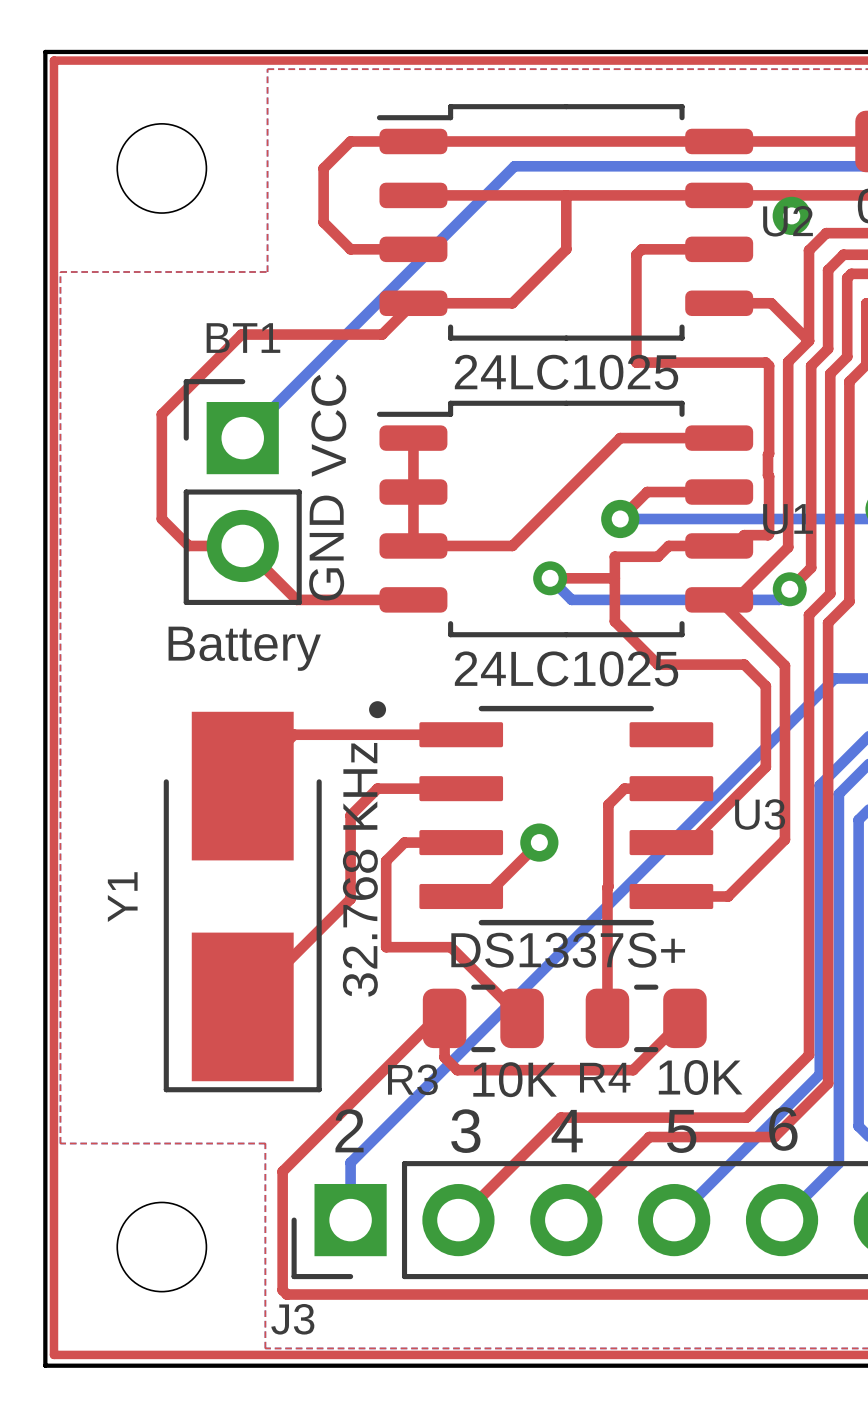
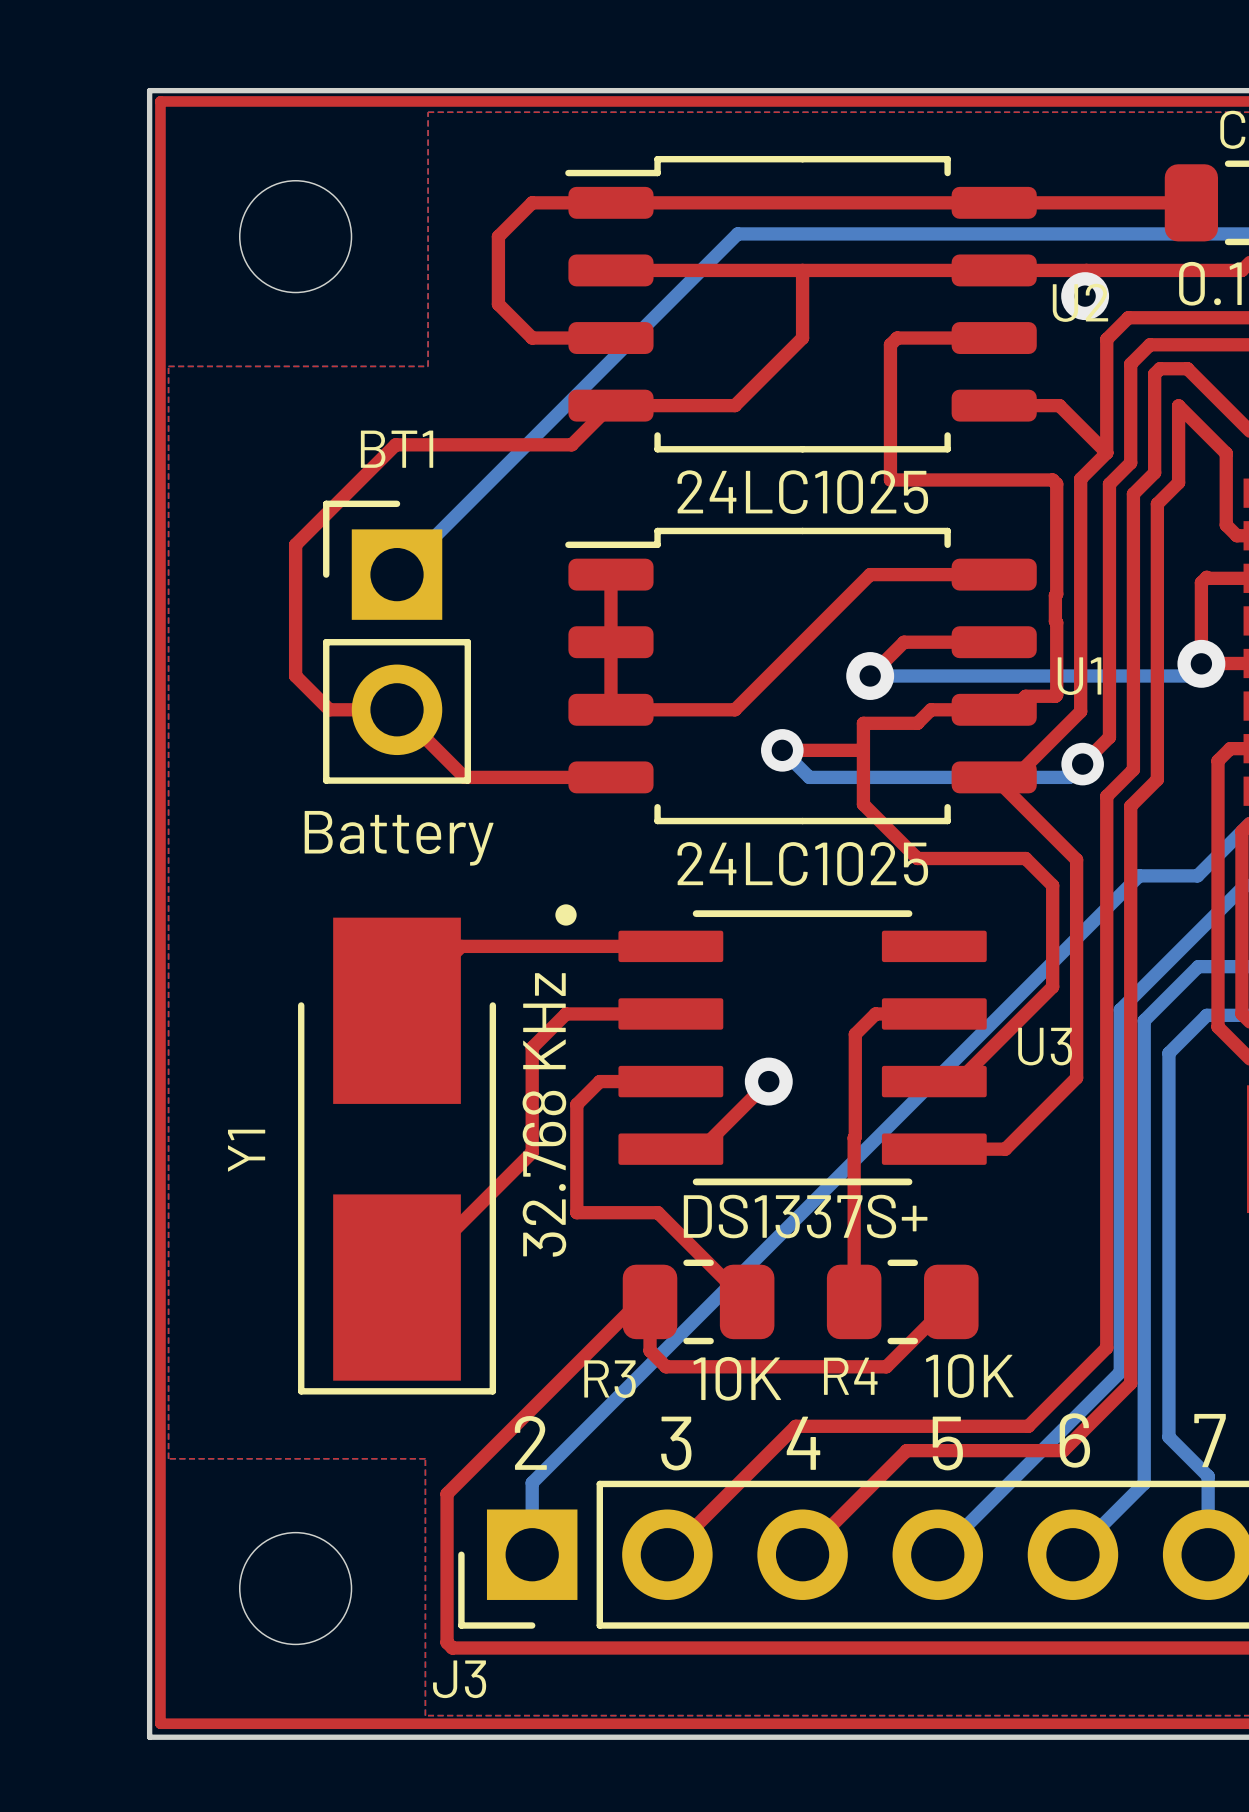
text: VCC (328, 425) -> none
text: GND (326, 548) -> none

